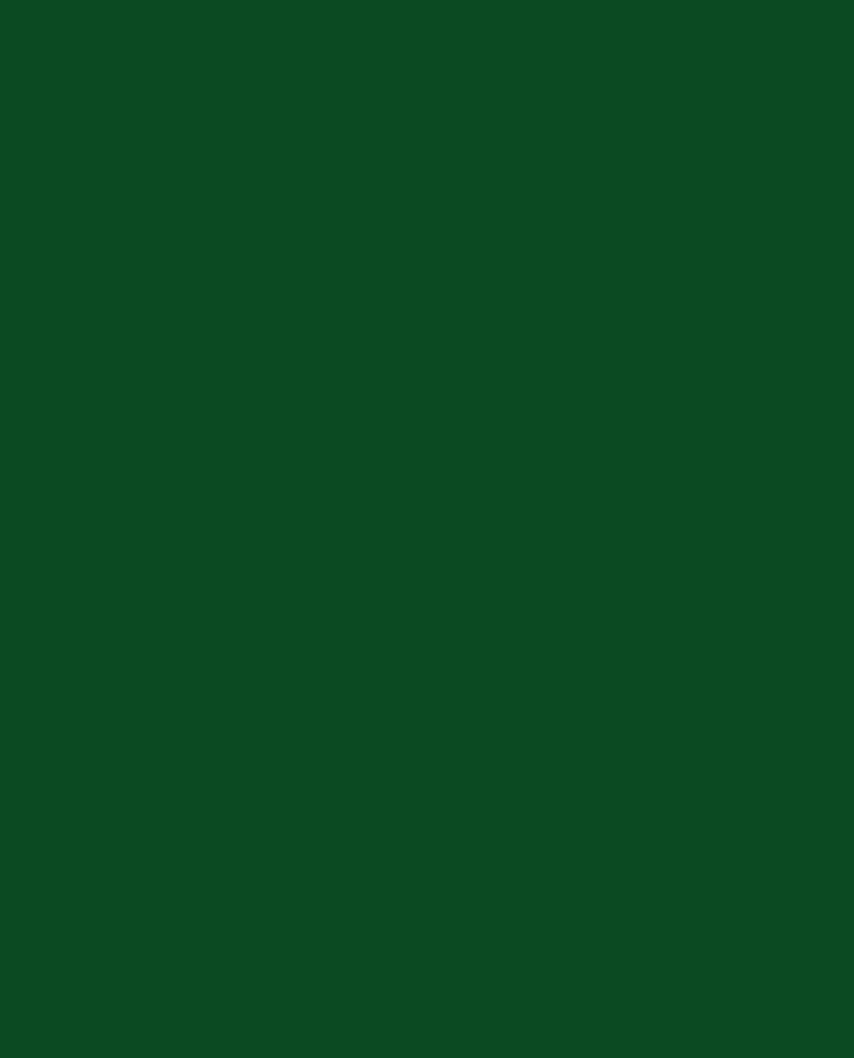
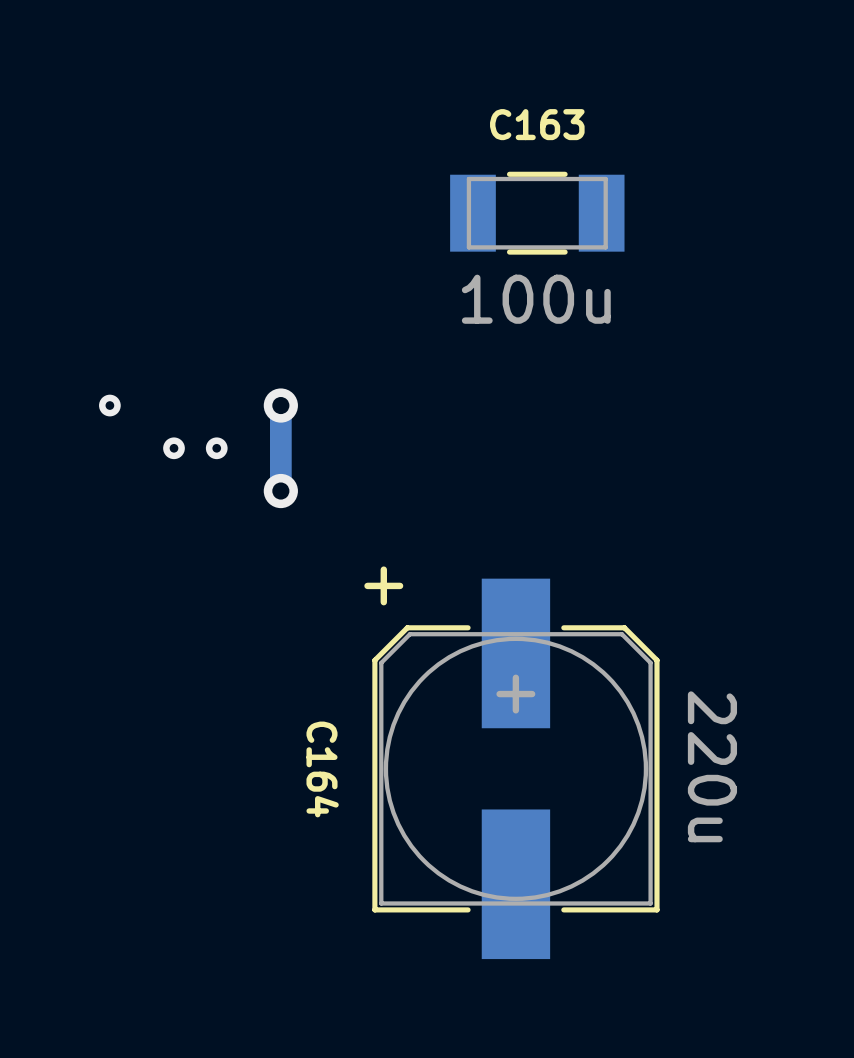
C163: none -> 100u (537, 213)
via: none -> (109, 405)
track: none -> (280, 405) (280, 491)
via: none -> (280, 405)
via: none -> (174, 448)
via: none -> (216, 448)
via: none -> (280, 491)
C164: none -> 220u (515, 768)

